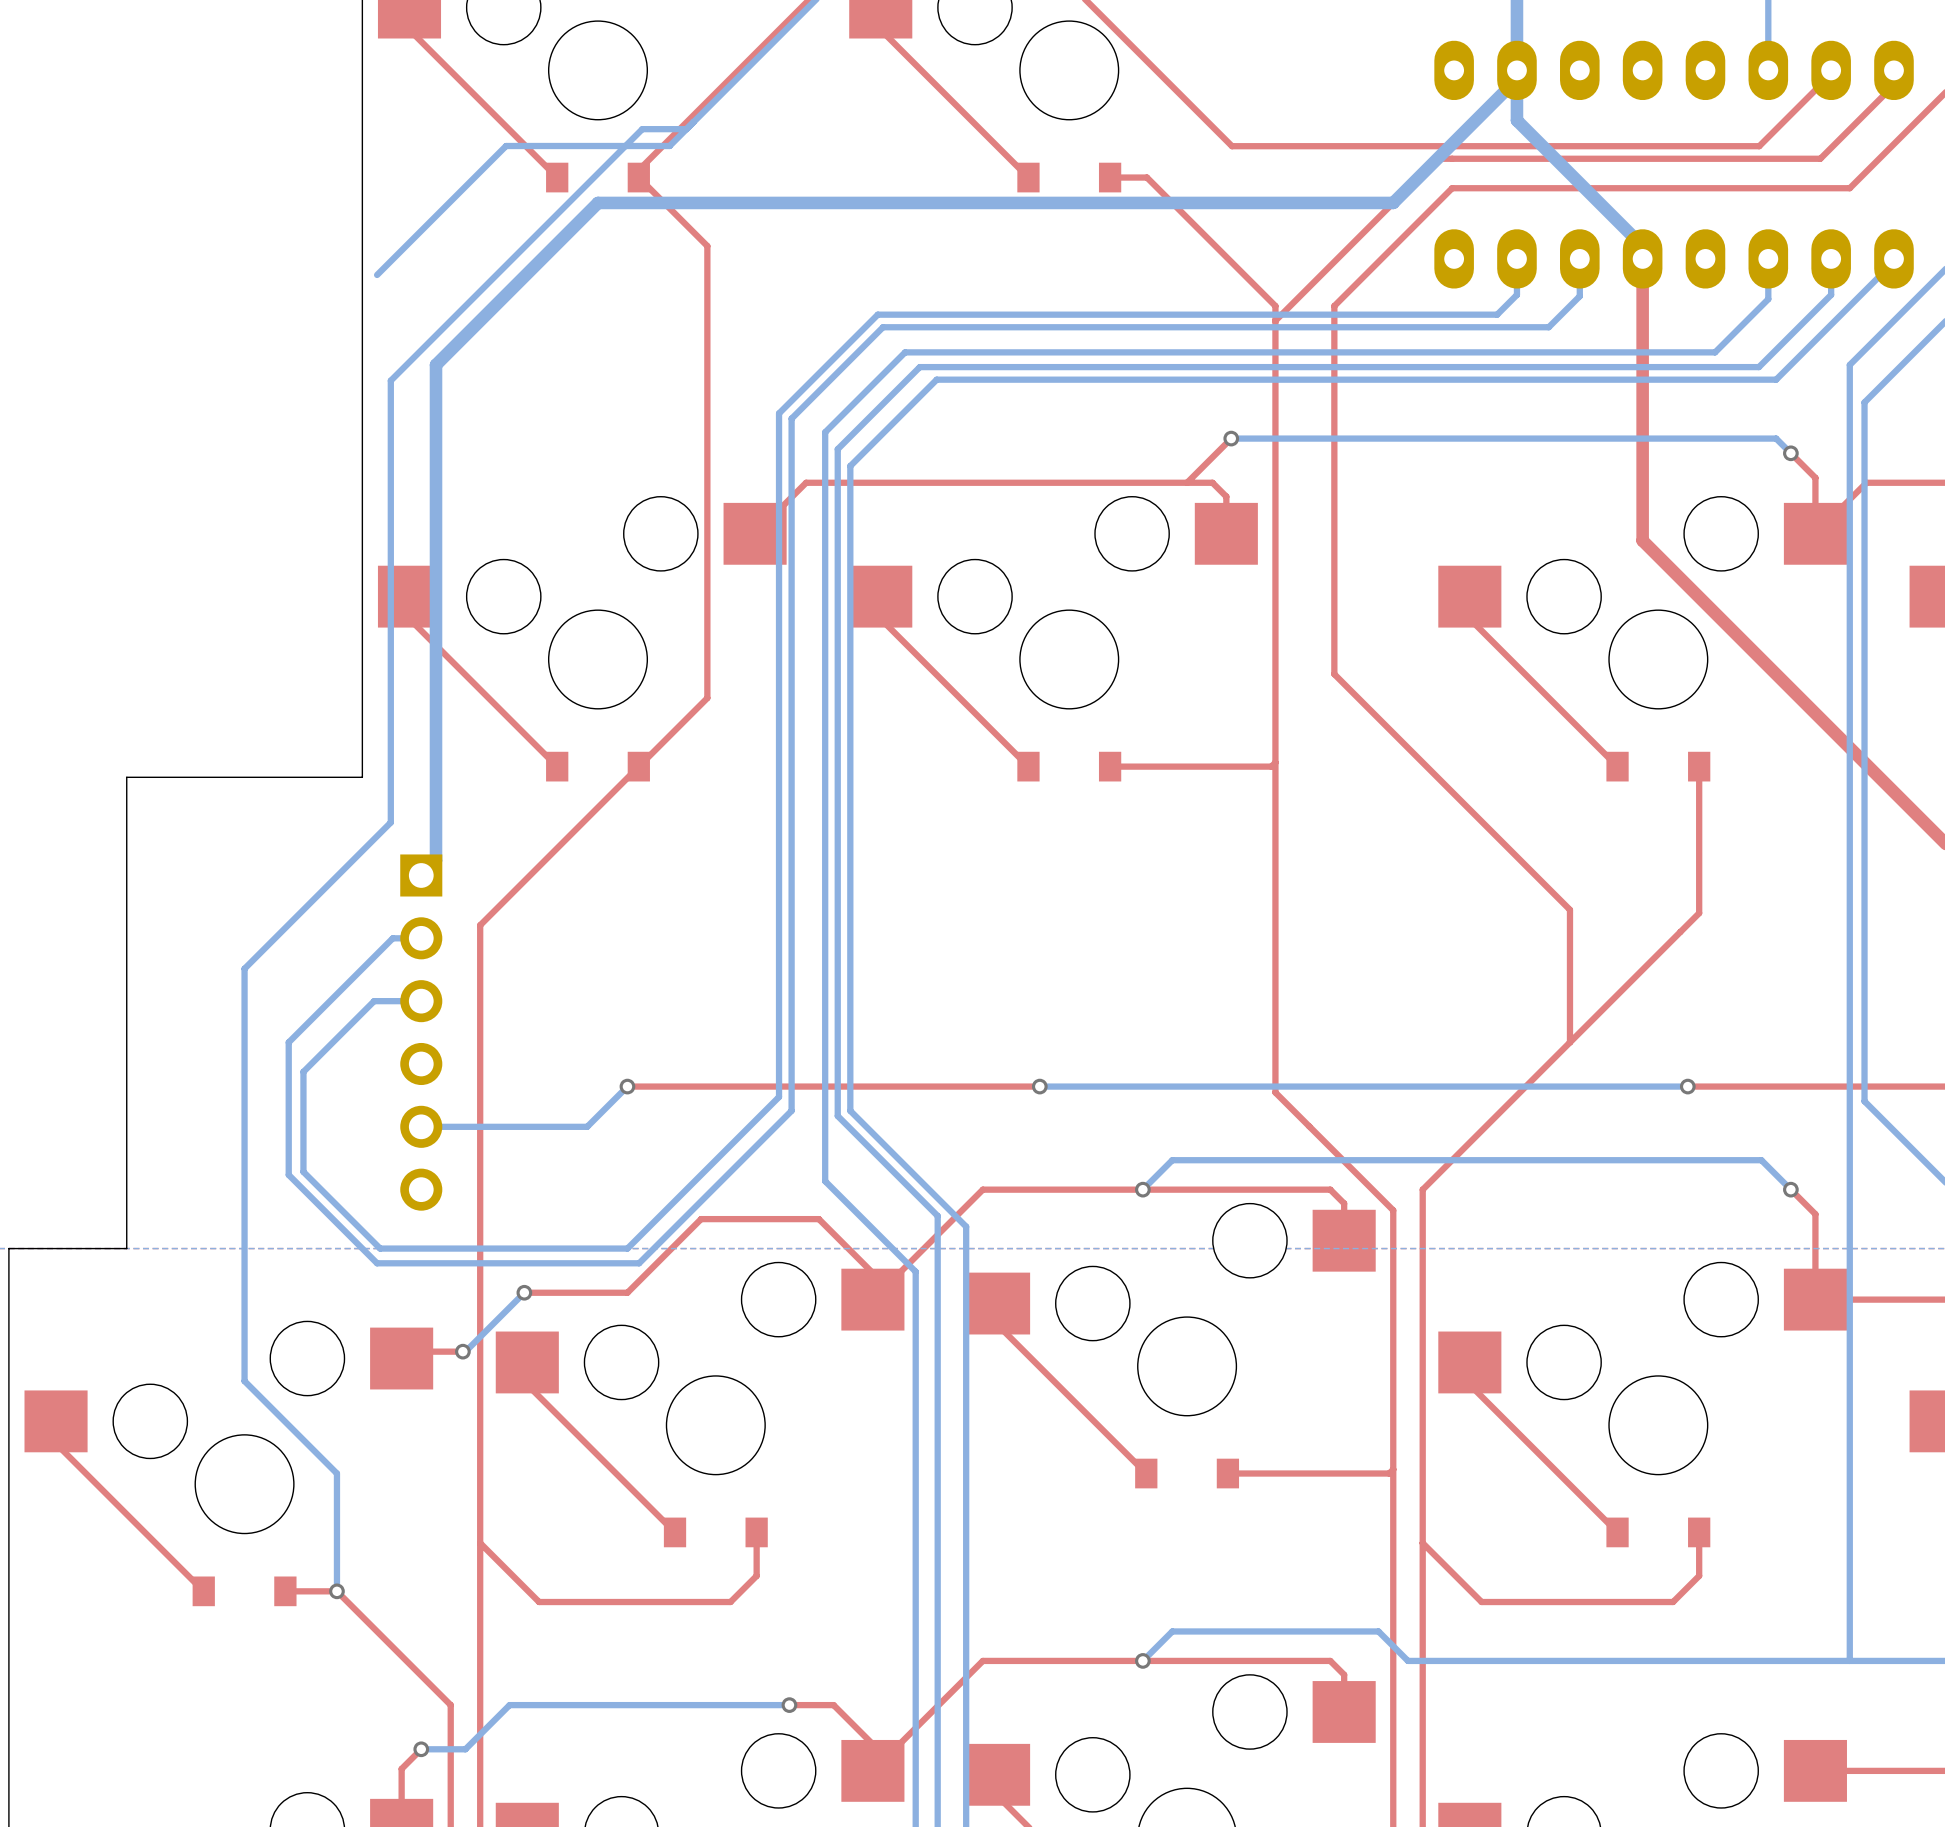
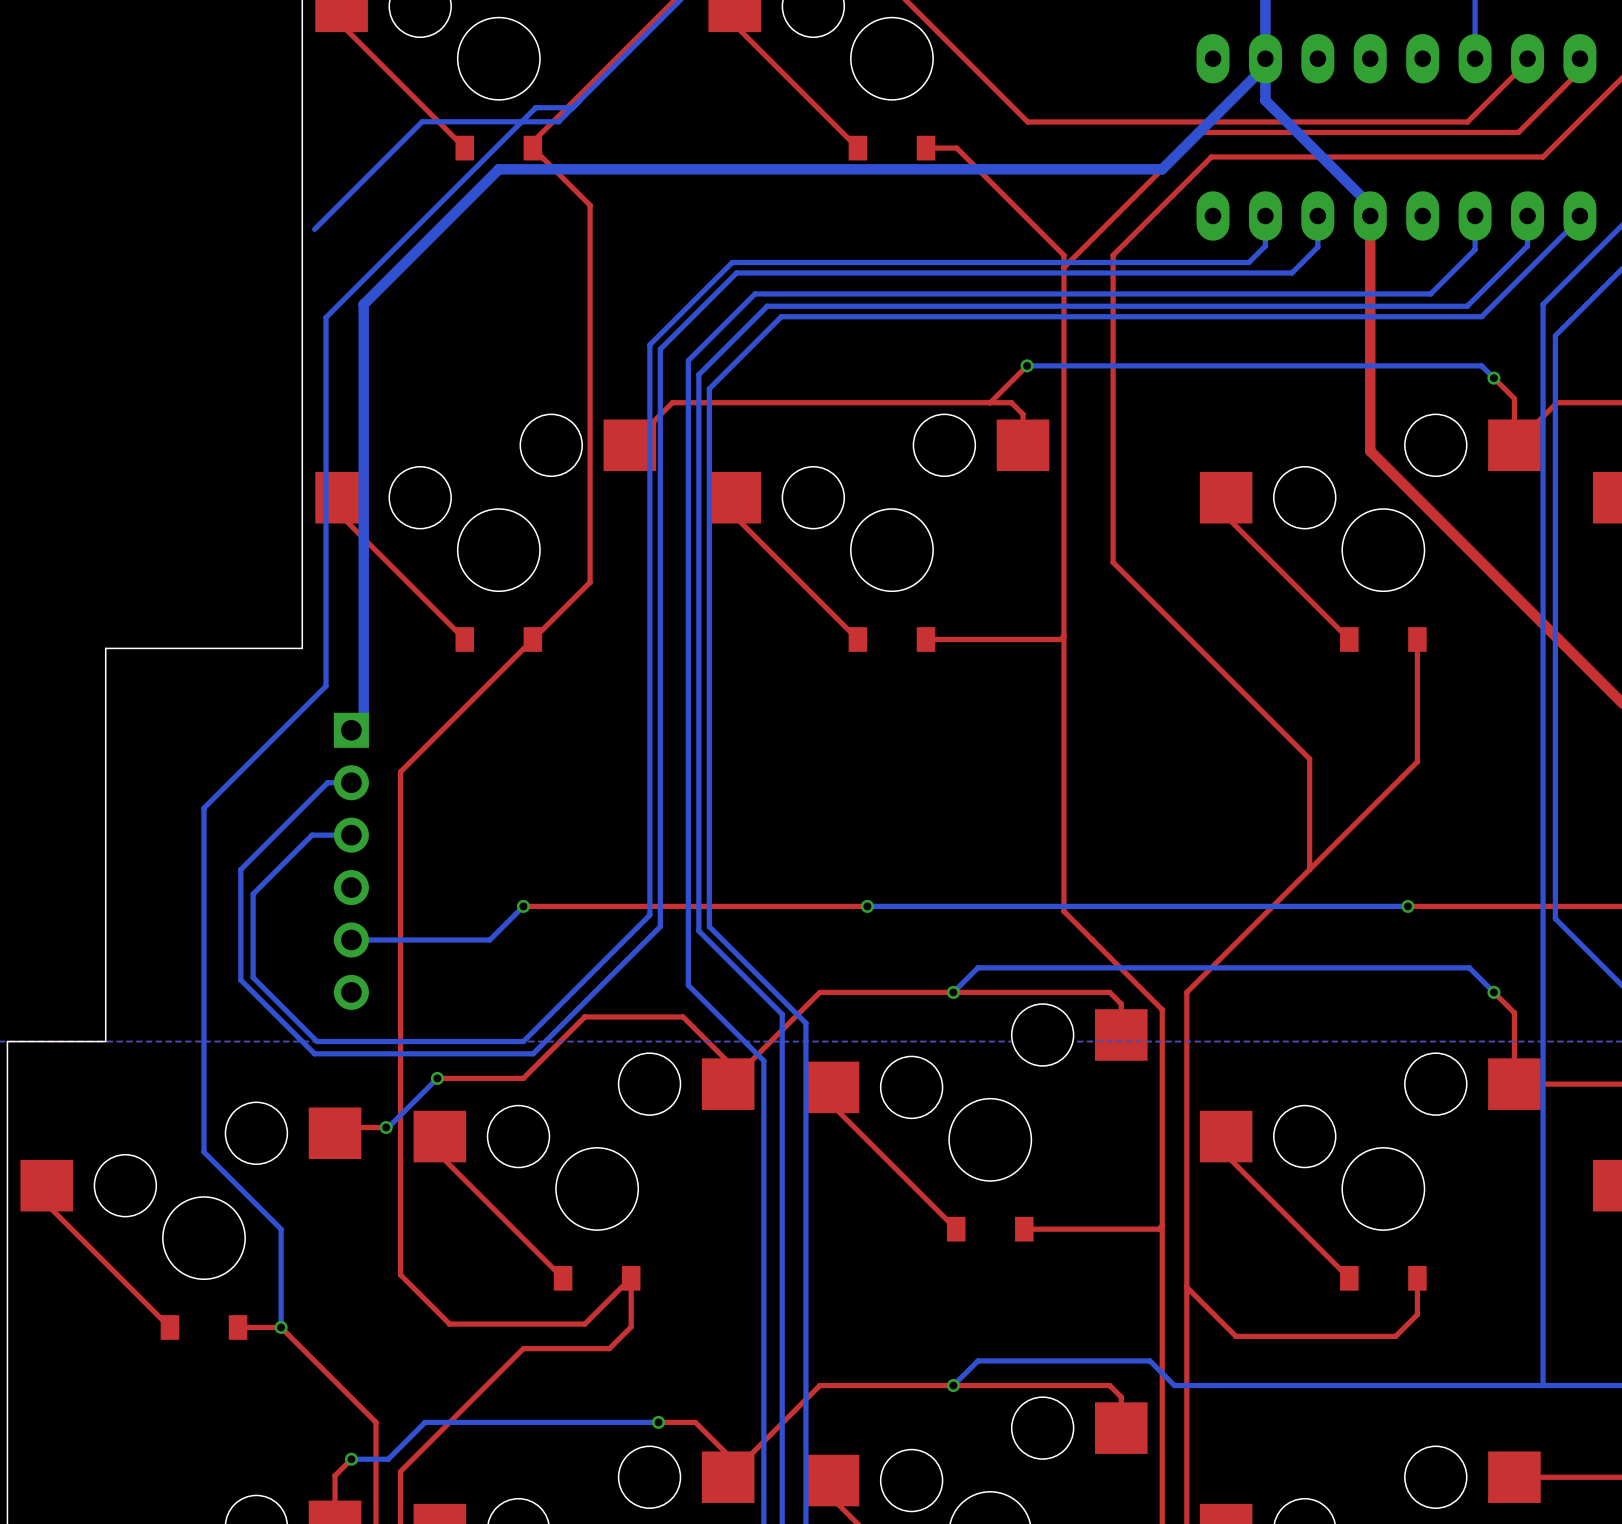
top track: (480, 1528) (480, 1764) -> (400, 1274) (449, 1324) (584, 1324) (631, 1278)
top track: (480, 1543) (539, 1602) (730, 1602) (756, 1575) -> (400, 1471) (523, 1348) (609, 1348) (631, 1326) (631, 1314)

